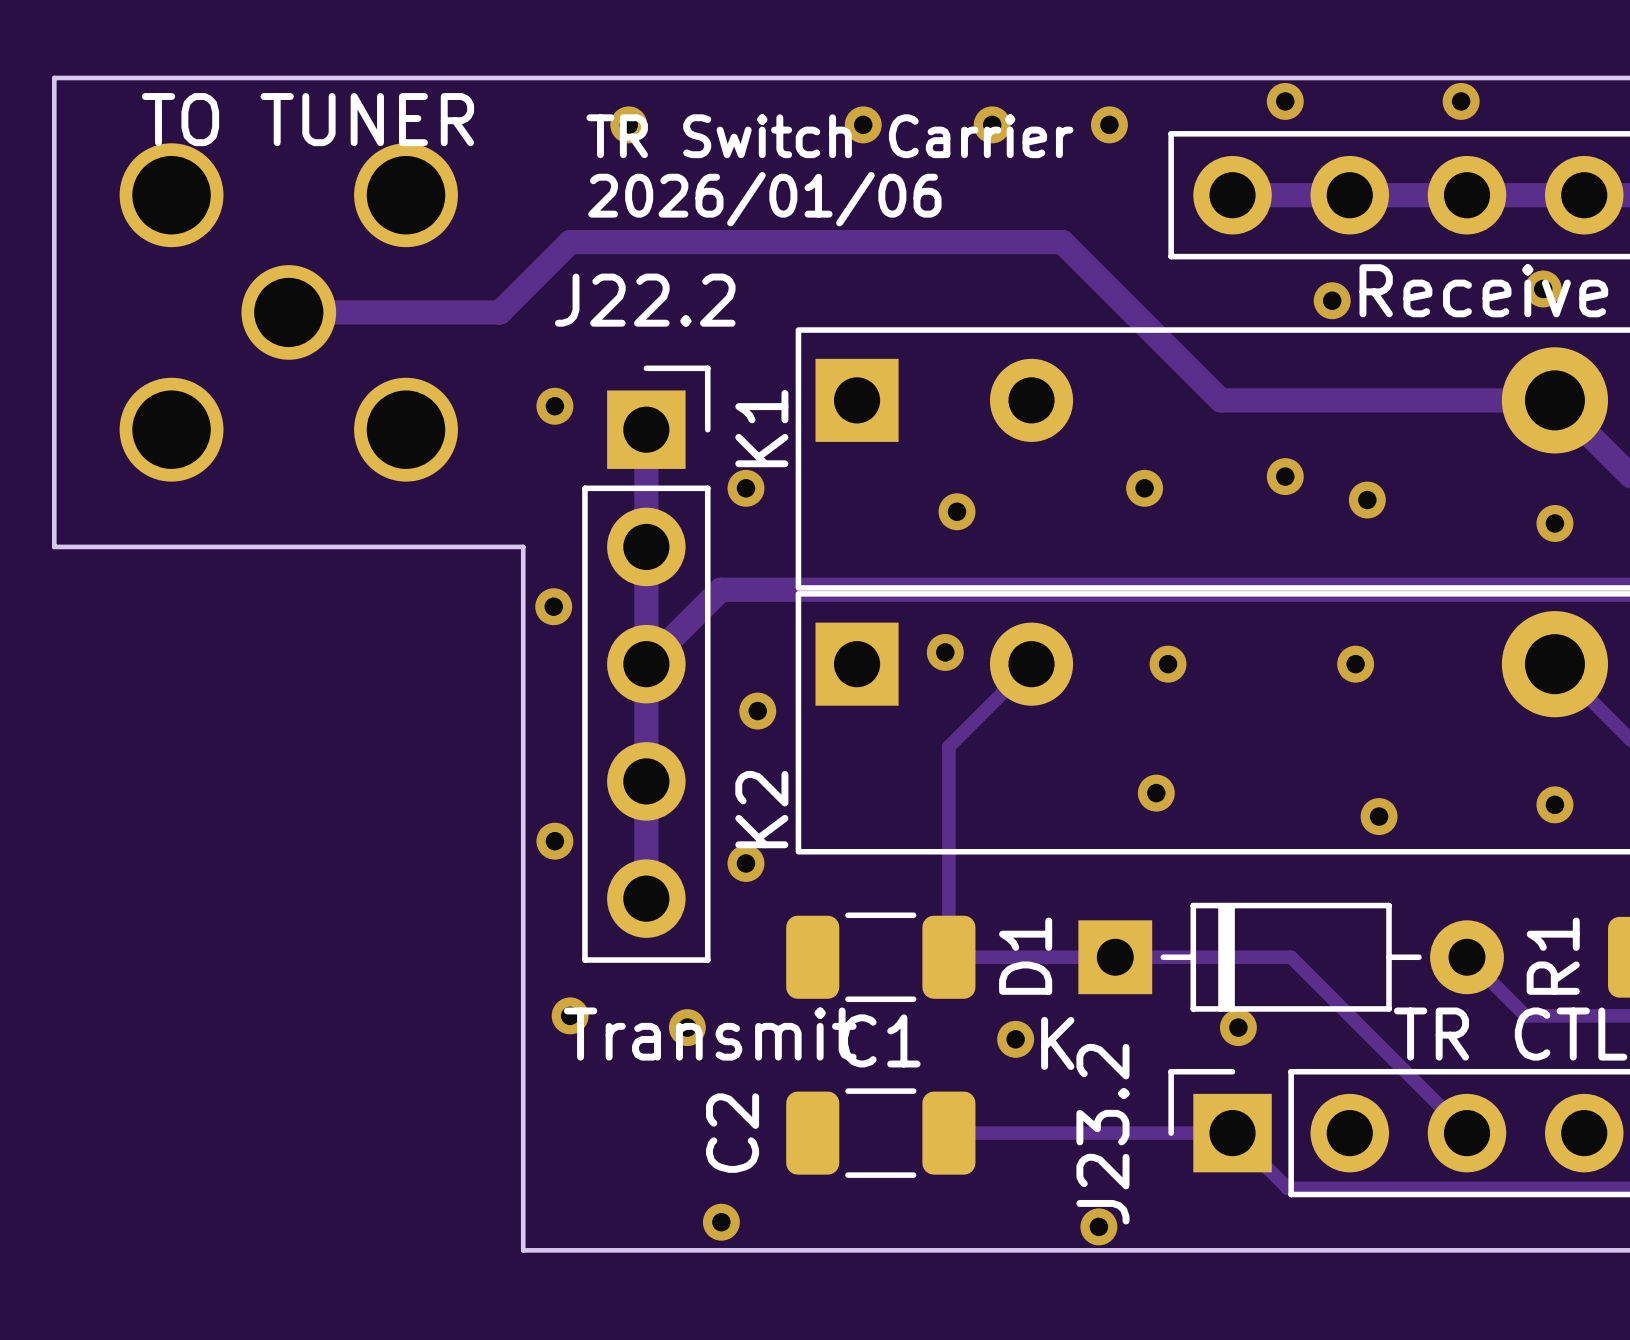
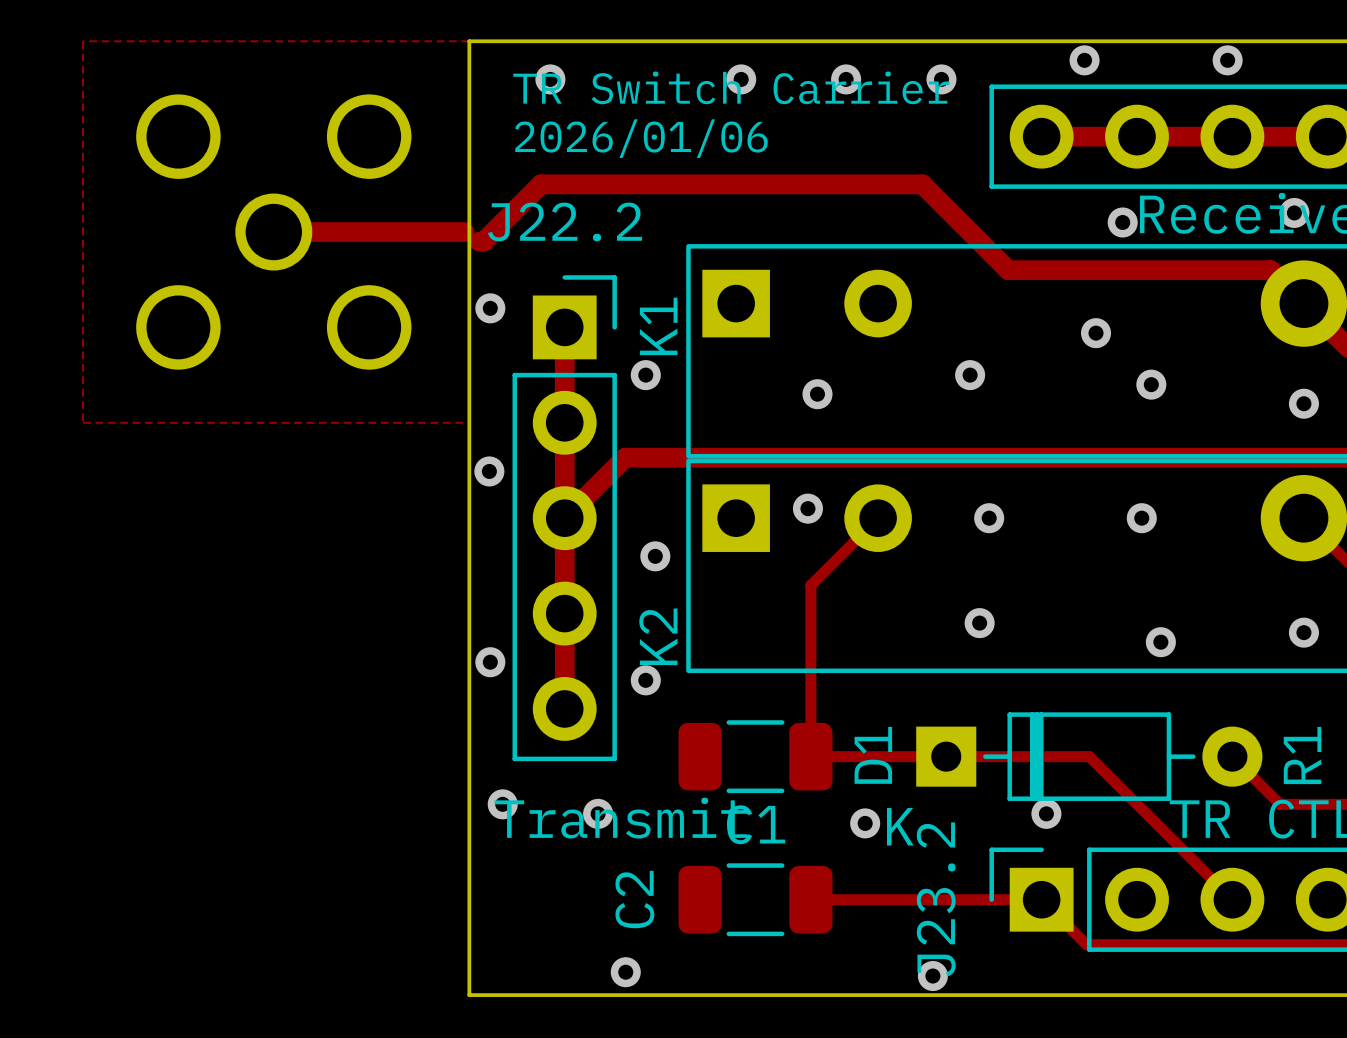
board edge: (529, 77) (54, 77) (54, 546) (523, 546) (523, 1250) (529, 1250) -> (469, 41) (469, 995)
text: TO TUNER (307, 119) -> none
track: (499, 312) (570, 242) (1062, 242) (1220, 400) (1554, 400) -> (479, 241) (483, 241) (540, 184) (922, 184) (1008, 270) (1270, 270) (1303, 303)
track: none -> (445, 232) (464, 232)
via position: (1285, 476) -> (1096, 333)

